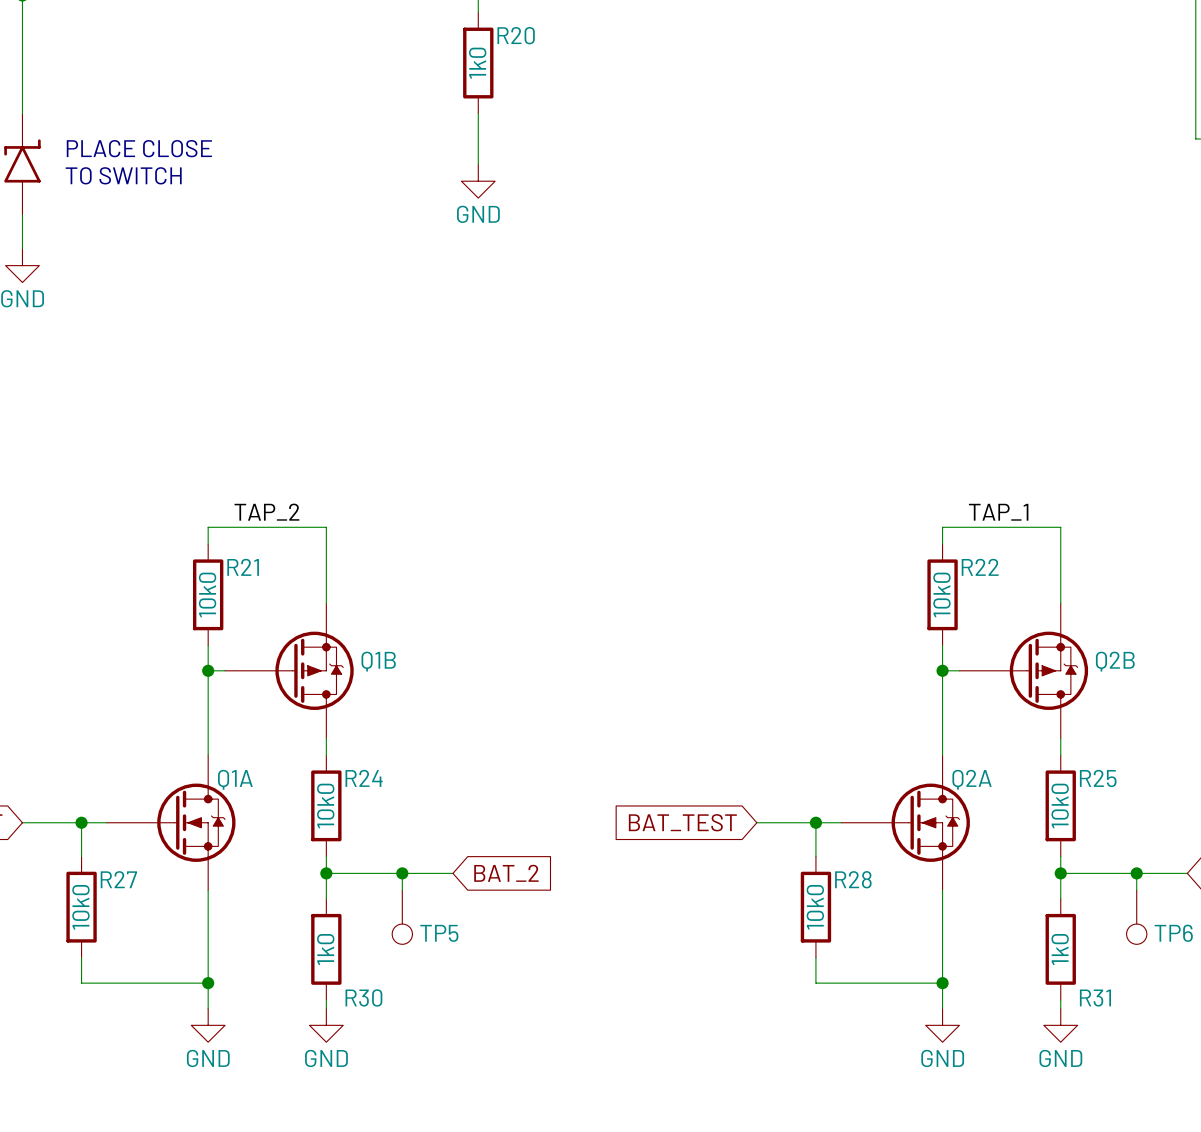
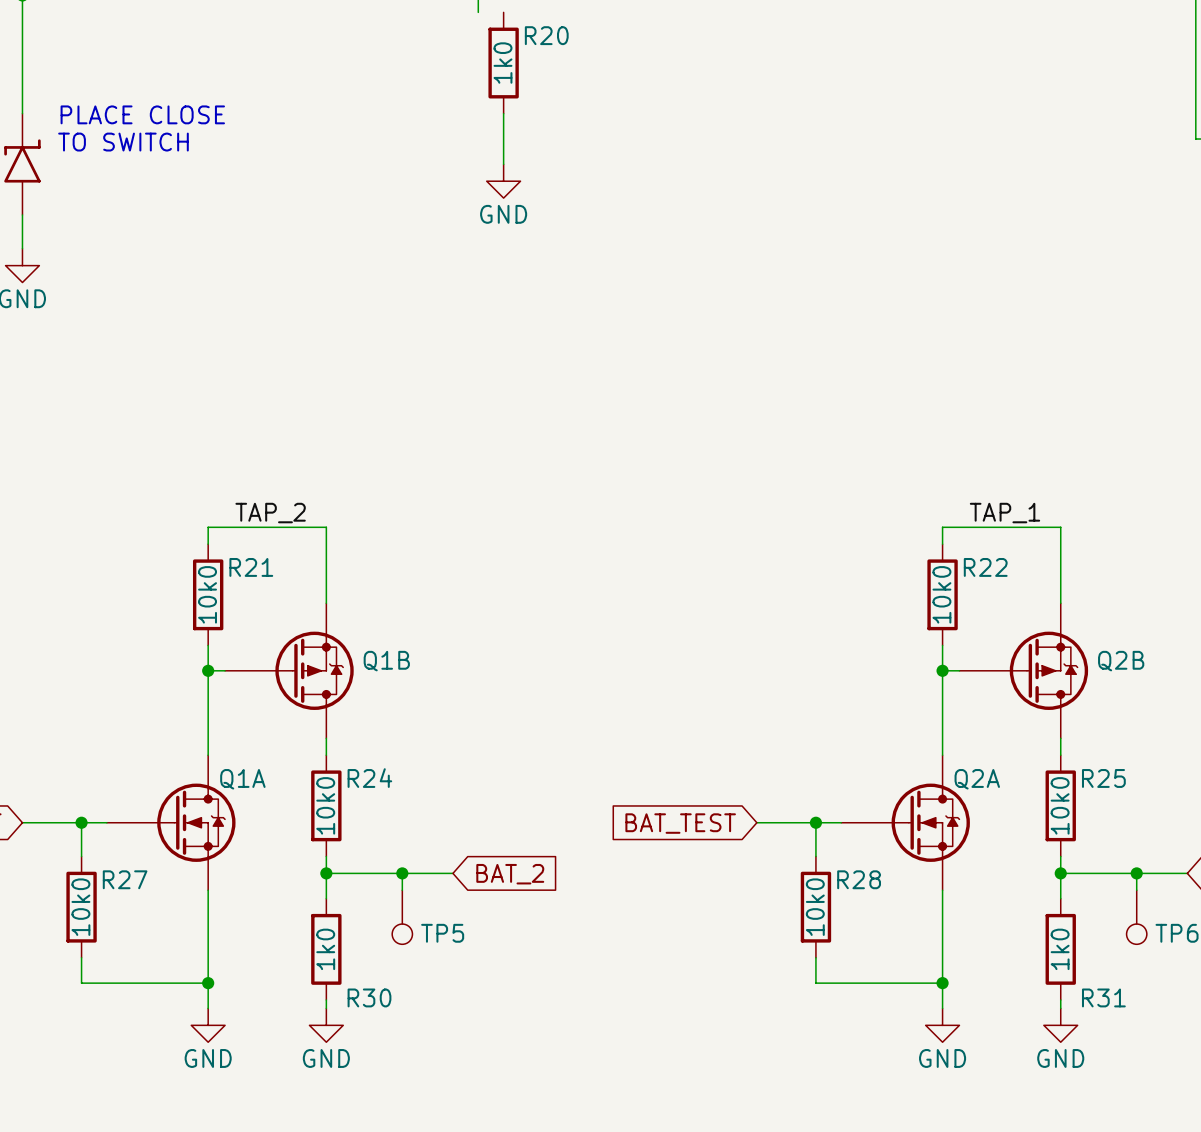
R20 position: (478, 63) -> (503, 63)
wire: (478, 113) (478, 164) -> (503, 113) (503, 164)
text position: PLACE CLOSE (139, 148) -> PLACE CLOSE (142, 114)
text position: TO SWITCH (123, 175) -> TO SWITCH (123, 142)
power symbol position: GND (478, 181) -> GND (503, 181)

